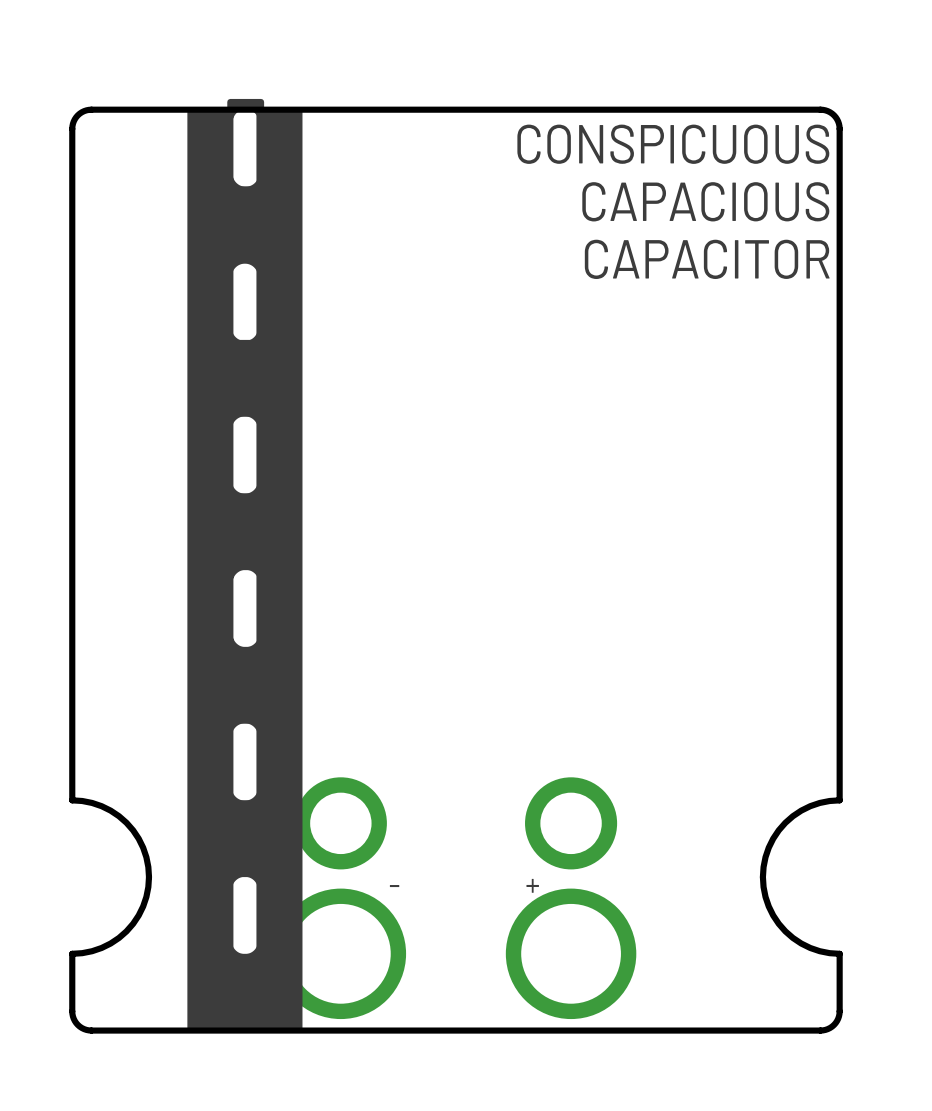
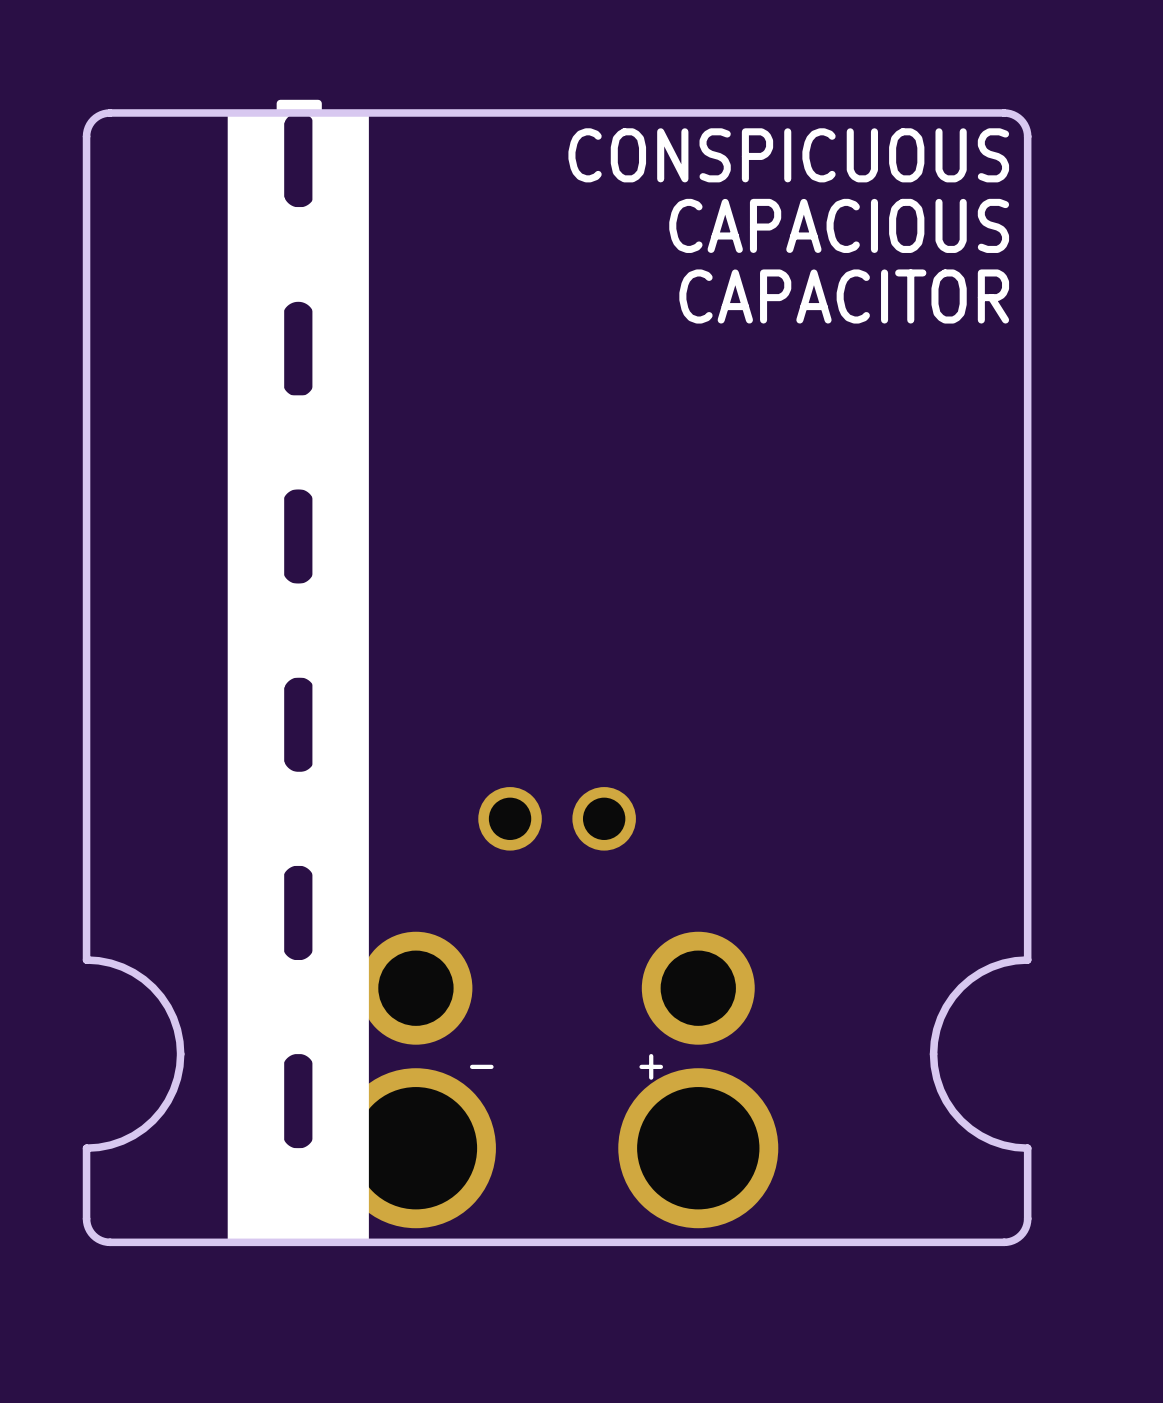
via: none -> (510, 818)
via: none -> (604, 818)

